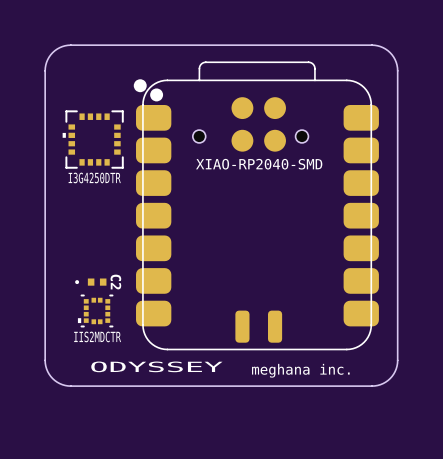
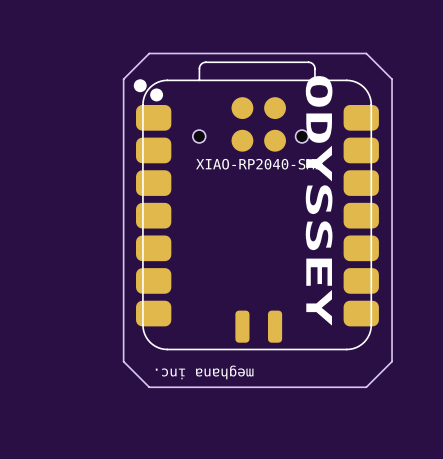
board edge: (371, 45) (70, 45) (59, 47) (52, 52) (46, 62) (45, 70) (45, 360) (47, 371) (52, 378) (62, 384) (70, 386) (371, 386) (383, 383) (390, 378) (395, 371) (397, 360) (397, 70) (395, 59) (390, 52) (380, 46) (371, 45) -> (366, 53) (392, 79) (392, 361) (366, 387) (149, 387) (123, 361) (123, 79) (149, 53) (366, 53)
part: I3G4250DTR (93, 139) -> none
text: none -> ODYSSEY (319, 200)
part: C2 (90, 282) -> none
part: IIS2MDCTR (95, 310) -> none
text: ODYSSEY (156, 366) -> none
text rotation: 0° (300, 370) -> 180° (204, 372)

